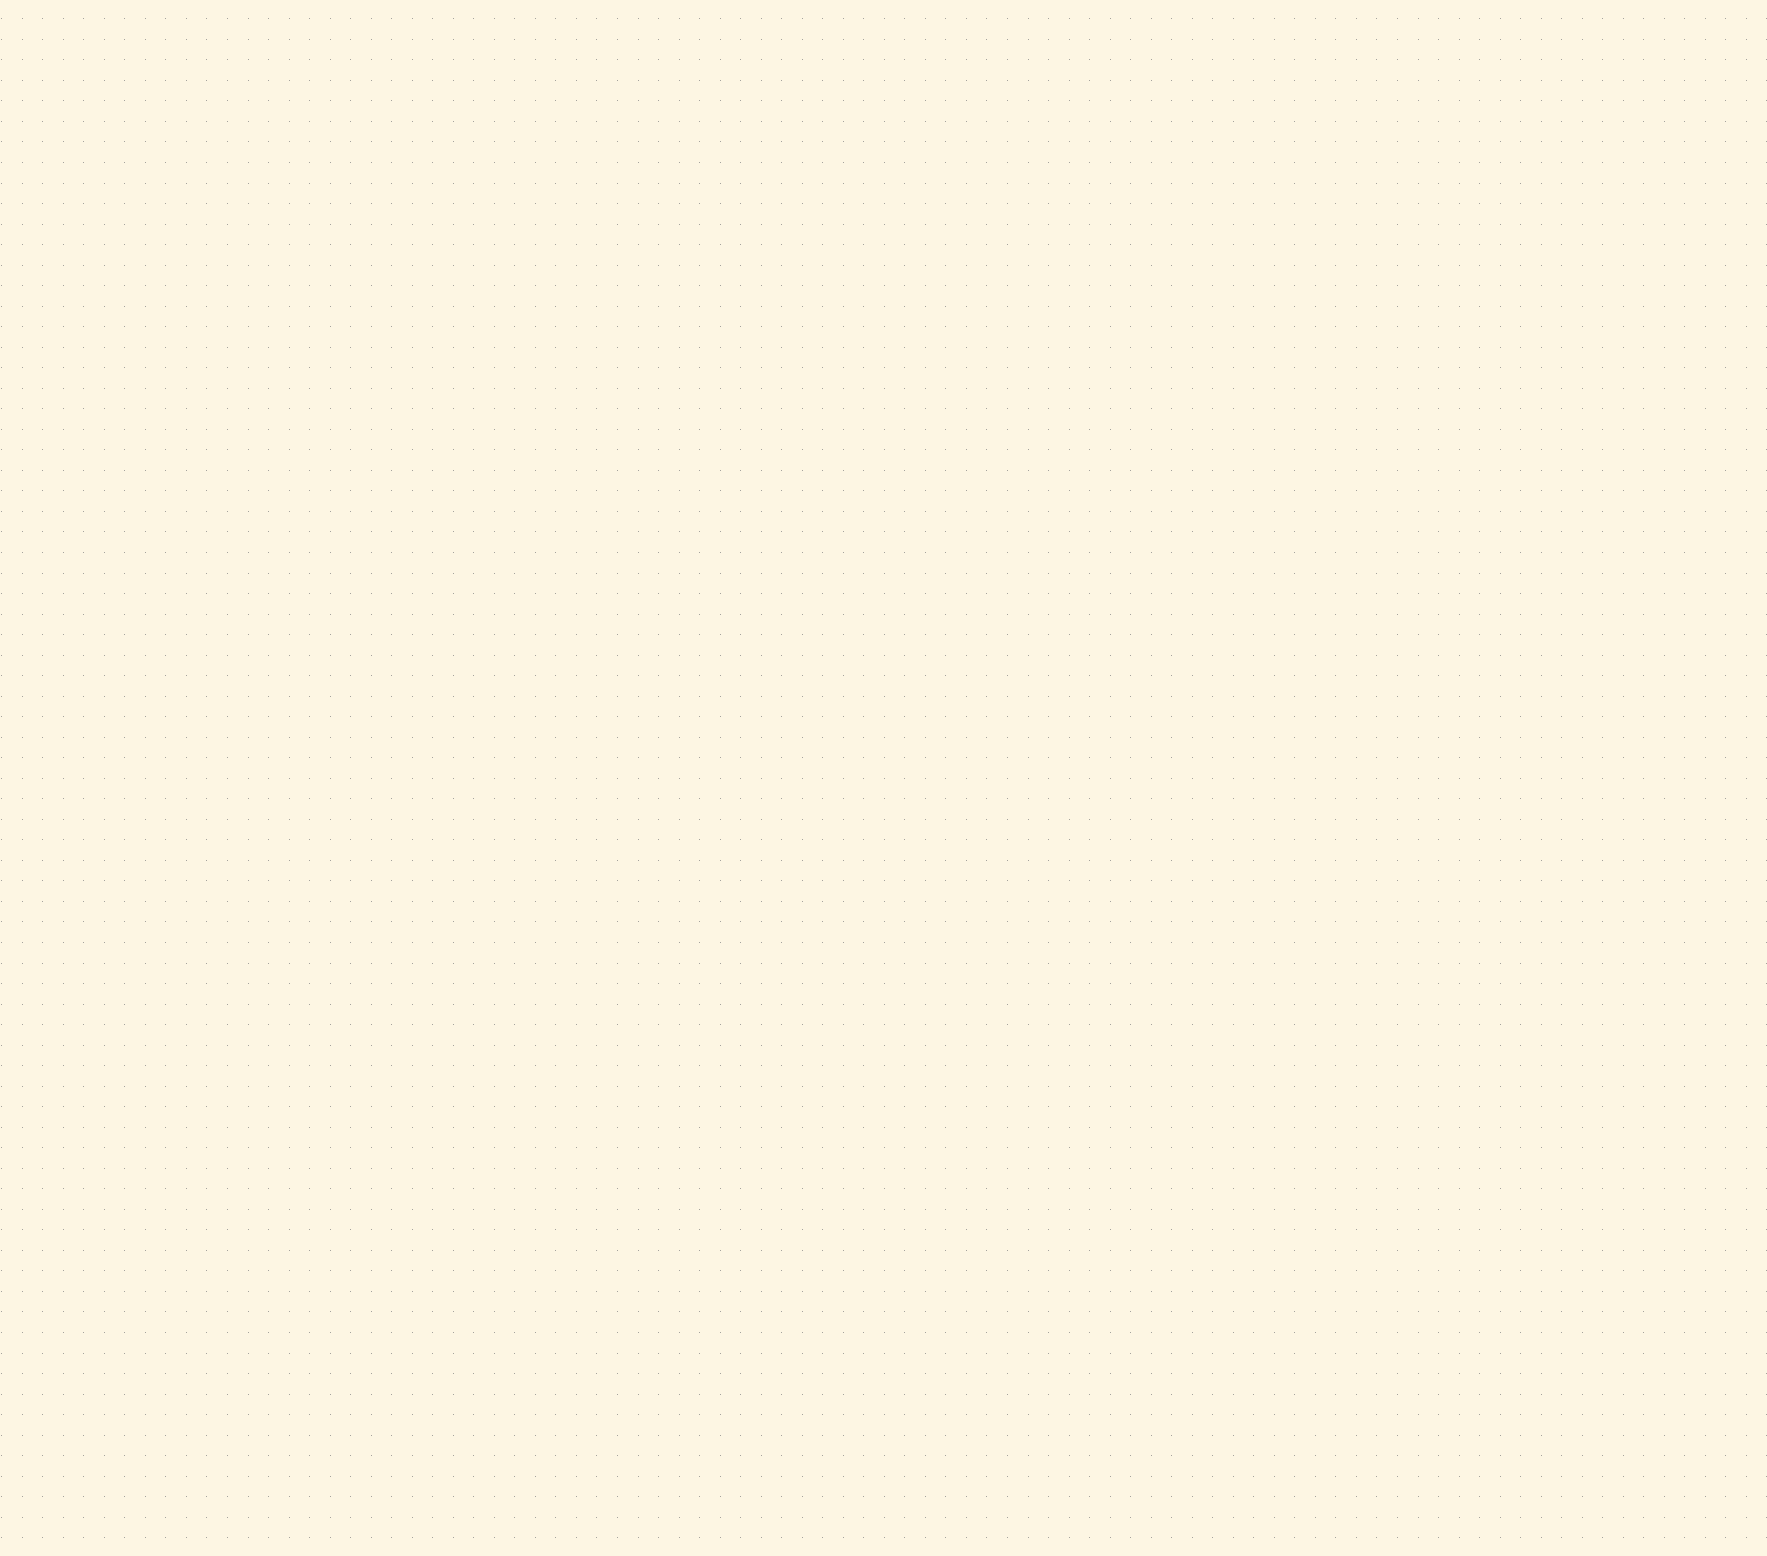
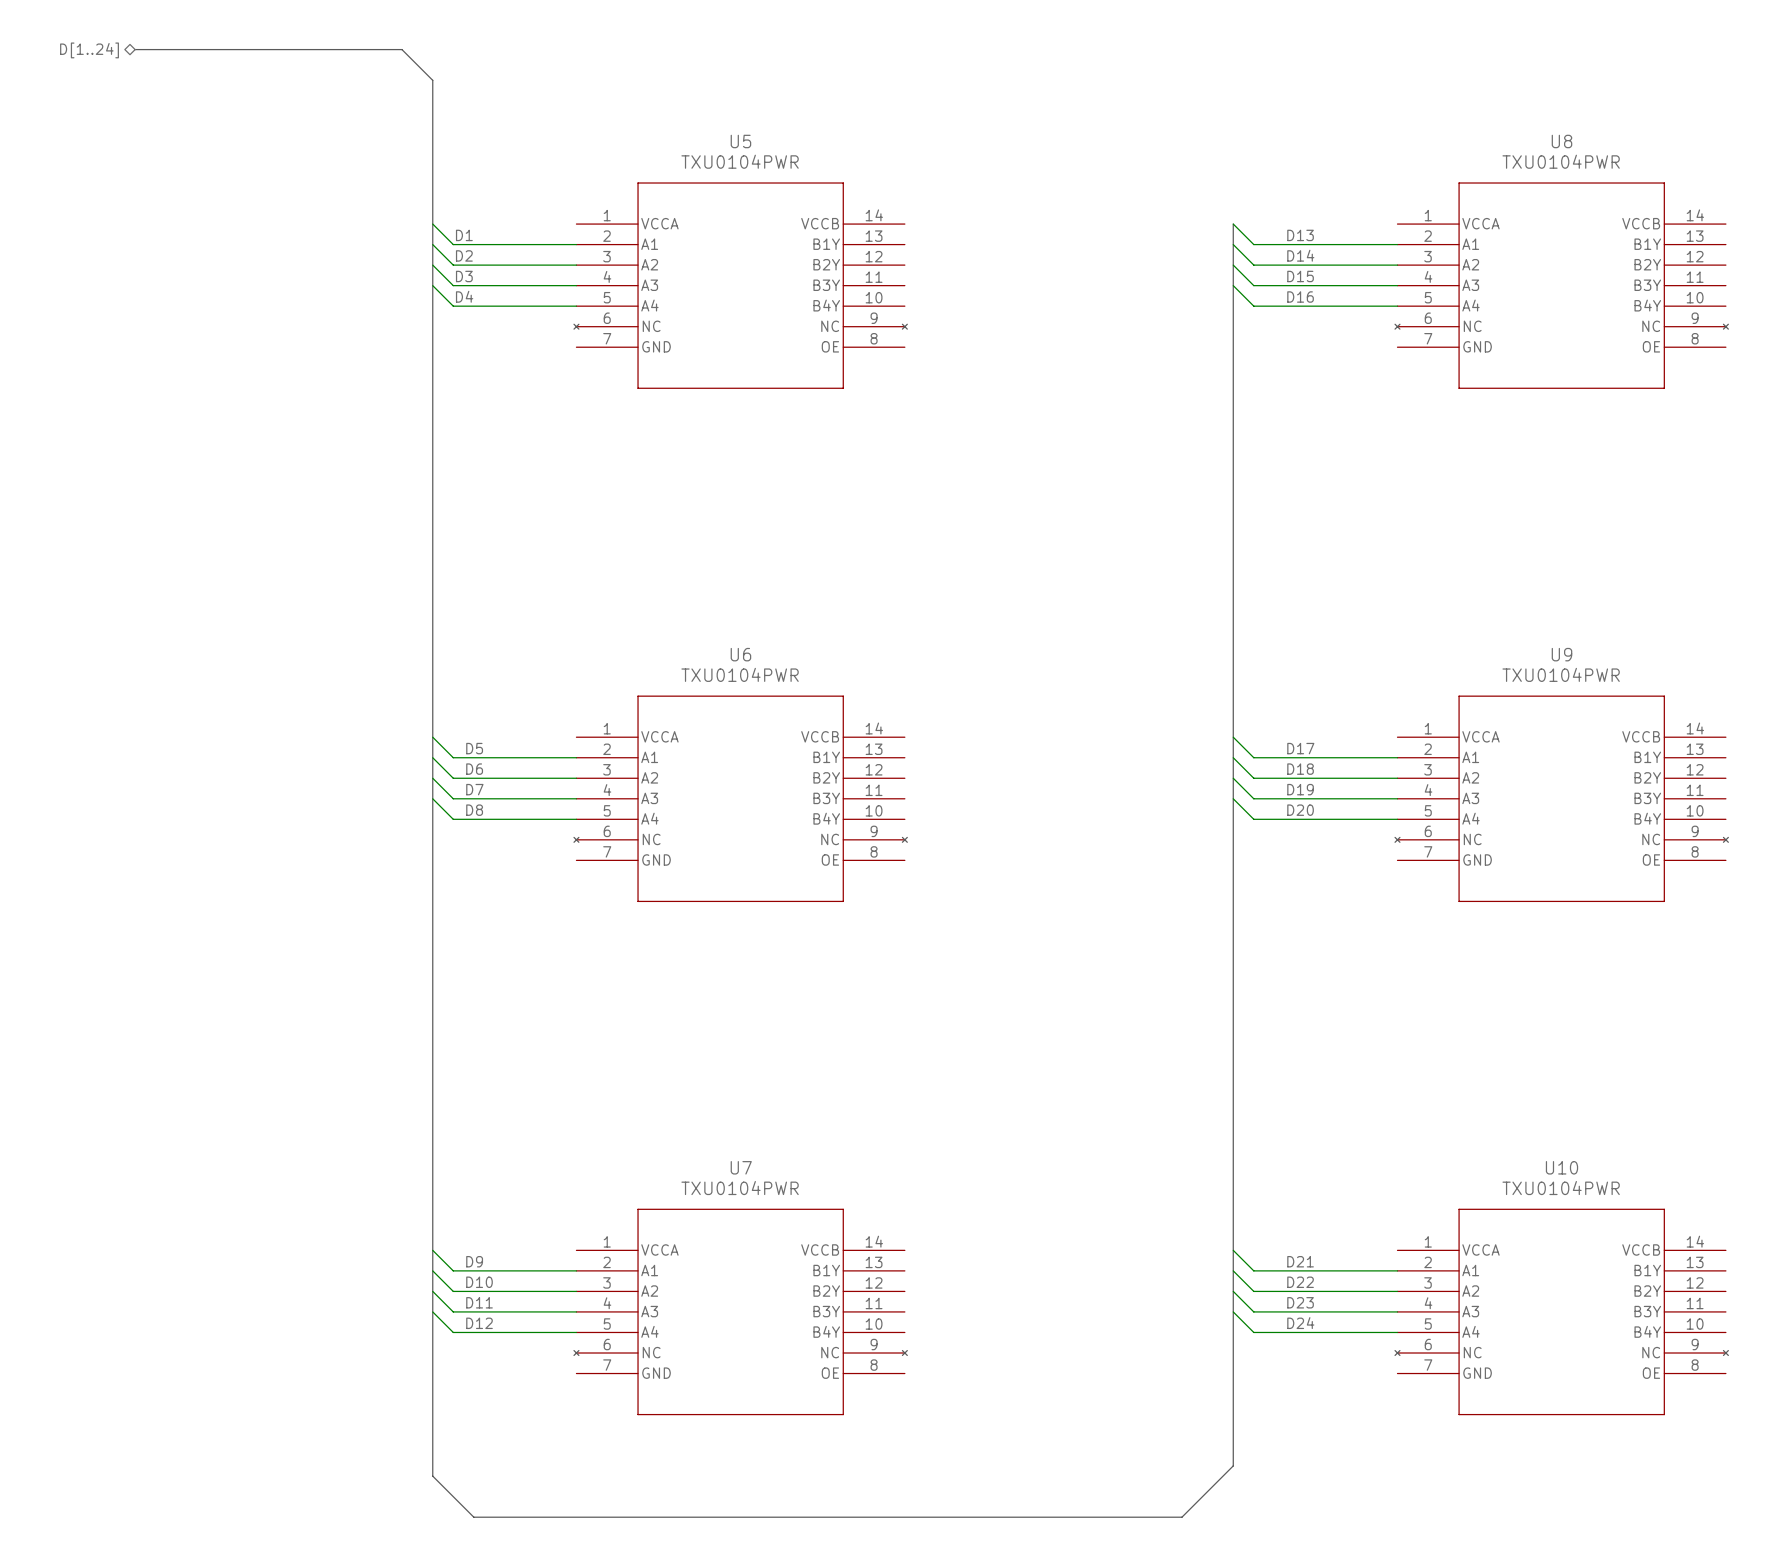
bus: none -> (135, 49) (401, 49) (432, 80) (432, 1476) (473, 1517) (1181, 1517) (1233, 1465) (1233, 224)
hierarchical label: none -> D[1..24] (89, 50)
wire: none -> (432, 224) (453, 244) (576, 244)
wire: none -> (1233, 224) (1253, 244) (1397, 244)
label: none -> D1 (464, 235)
label: none -> D13 (1300, 235)
wire: none -> (432, 244) (453, 265) (576, 265)
wire: none -> (1233, 244) (1253, 265) (1397, 265)
label: none -> D2 (464, 255)
label: none -> D14 (1300, 255)
wire: none -> (432, 265) (453, 285) (576, 285)
wire: none -> (1233, 265) (1253, 285) (1397, 285)
label: none -> D3 (464, 276)
label: none -> D15 (1300, 276)
wire: none -> (432, 285) (453, 306) (576, 306)
U5: none -> TXU0104PWR (740, 285)
wire: none -> (1233, 285) (1253, 306) (1397, 306)
U8: none -> TXU0104PWR (1561, 285)
label: none -> D4 (464, 296)
label: none -> D16 (1300, 297)
wire: none -> (432, 737) (453, 757) (576, 757)
wire: none -> (1233, 737) (1253, 757) (1397, 757)
label: none -> D5 (474, 748)
label: none -> D17 (1300, 748)
wire: none -> (432, 757) (453, 778) (576, 778)
wire: none -> (1233, 757) (1253, 778) (1397, 778)
label: none -> D6 (474, 769)
label: none -> D18 (1300, 769)
wire: none -> (432, 778) (453, 798) (576, 798)
wire: none -> (1233, 778) (1253, 798) (1397, 798)
label: none -> D7 (474, 789)
label: none -> D19 (1300, 789)
wire: none -> (432, 798) (453, 819) (576, 819)
U6: none -> TXU0104PWR (740, 798)
wire: none -> (1233, 798) (1253, 819) (1397, 819)
U9: none -> TXU0104PWR (1561, 798)
label: none -> D8 (474, 810)
label: none -> D20 (1300, 810)
wire: none -> (432, 1250) (453, 1270) (576, 1270)
wire: none -> (1233, 1250) (1253, 1270) (1397, 1270)
label: none -> D9 (474, 1261)
label: none -> D21 (1300, 1261)
wire: none -> (432, 1270) (453, 1291) (576, 1291)
wire: none -> (1233, 1270) (1253, 1291) (1397, 1291)
label: none -> D10 (479, 1282)
label: none -> D22 (1300, 1282)
wire: none -> (432, 1291) (453, 1311) (576, 1311)
wire: none -> (1233, 1291) (1253, 1311) (1397, 1311)
label: none -> D11 (479, 1302)
label: none -> D23 (1300, 1302)
wire: none -> (432, 1311) (453, 1332) (576, 1332)
U7: none -> TXU0104PWR (740, 1311)
wire: none -> (1233, 1311) (1253, 1332) (1397, 1332)
U10: none -> TXU0104PWR (1561, 1311)
label: none -> D12 (479, 1323)
label: none -> D24 (1300, 1323)

